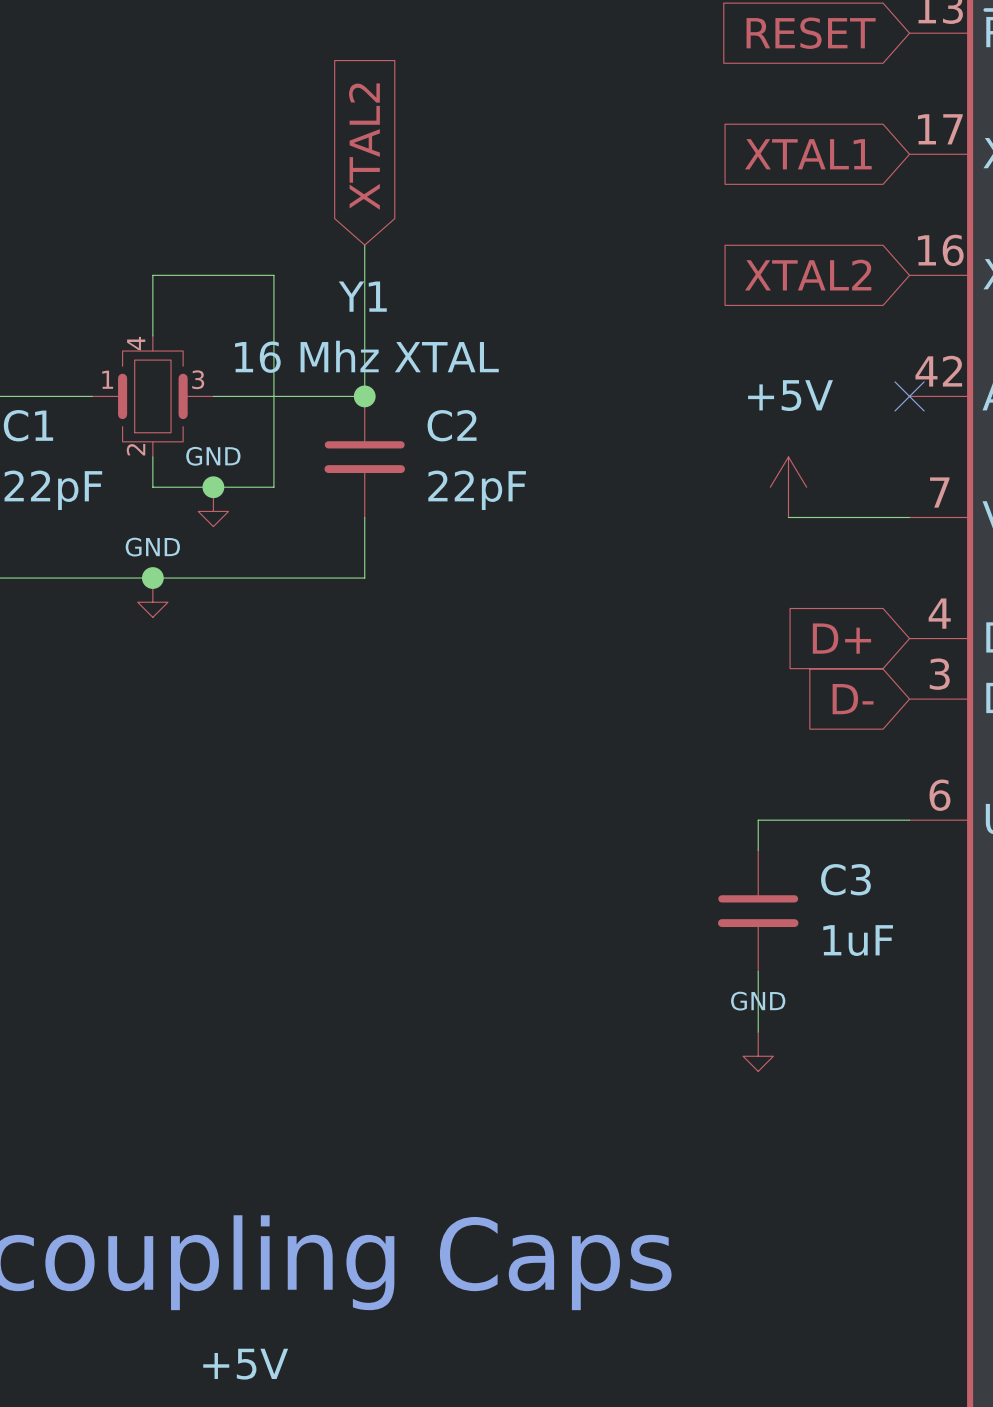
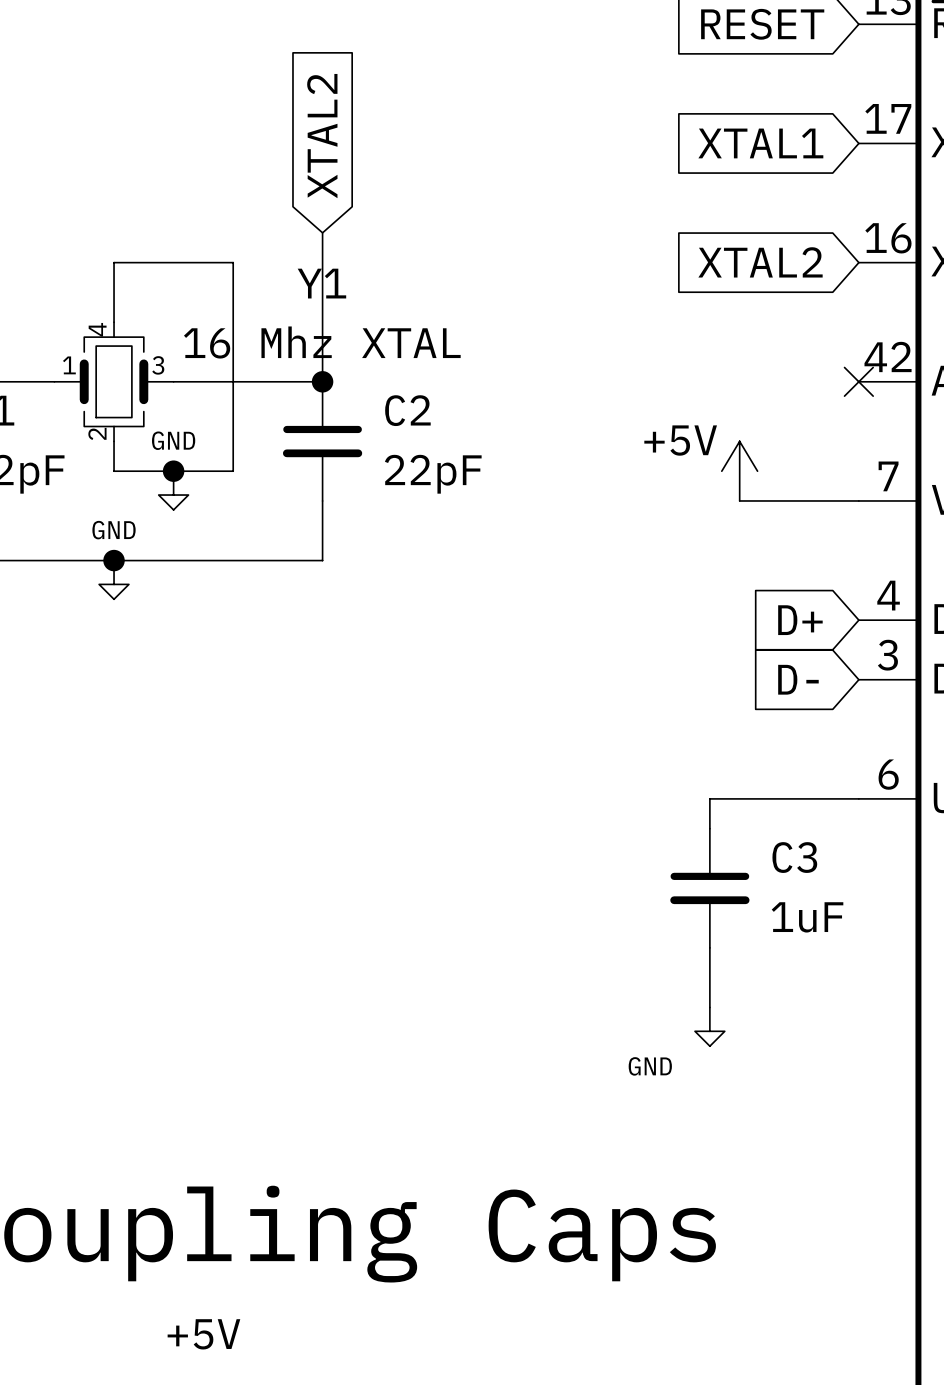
power symbol text position: +5V (790, 395) -> +5V (680, 440)
power symbol text position: GND (758, 1001) -> GND (650, 1066)

